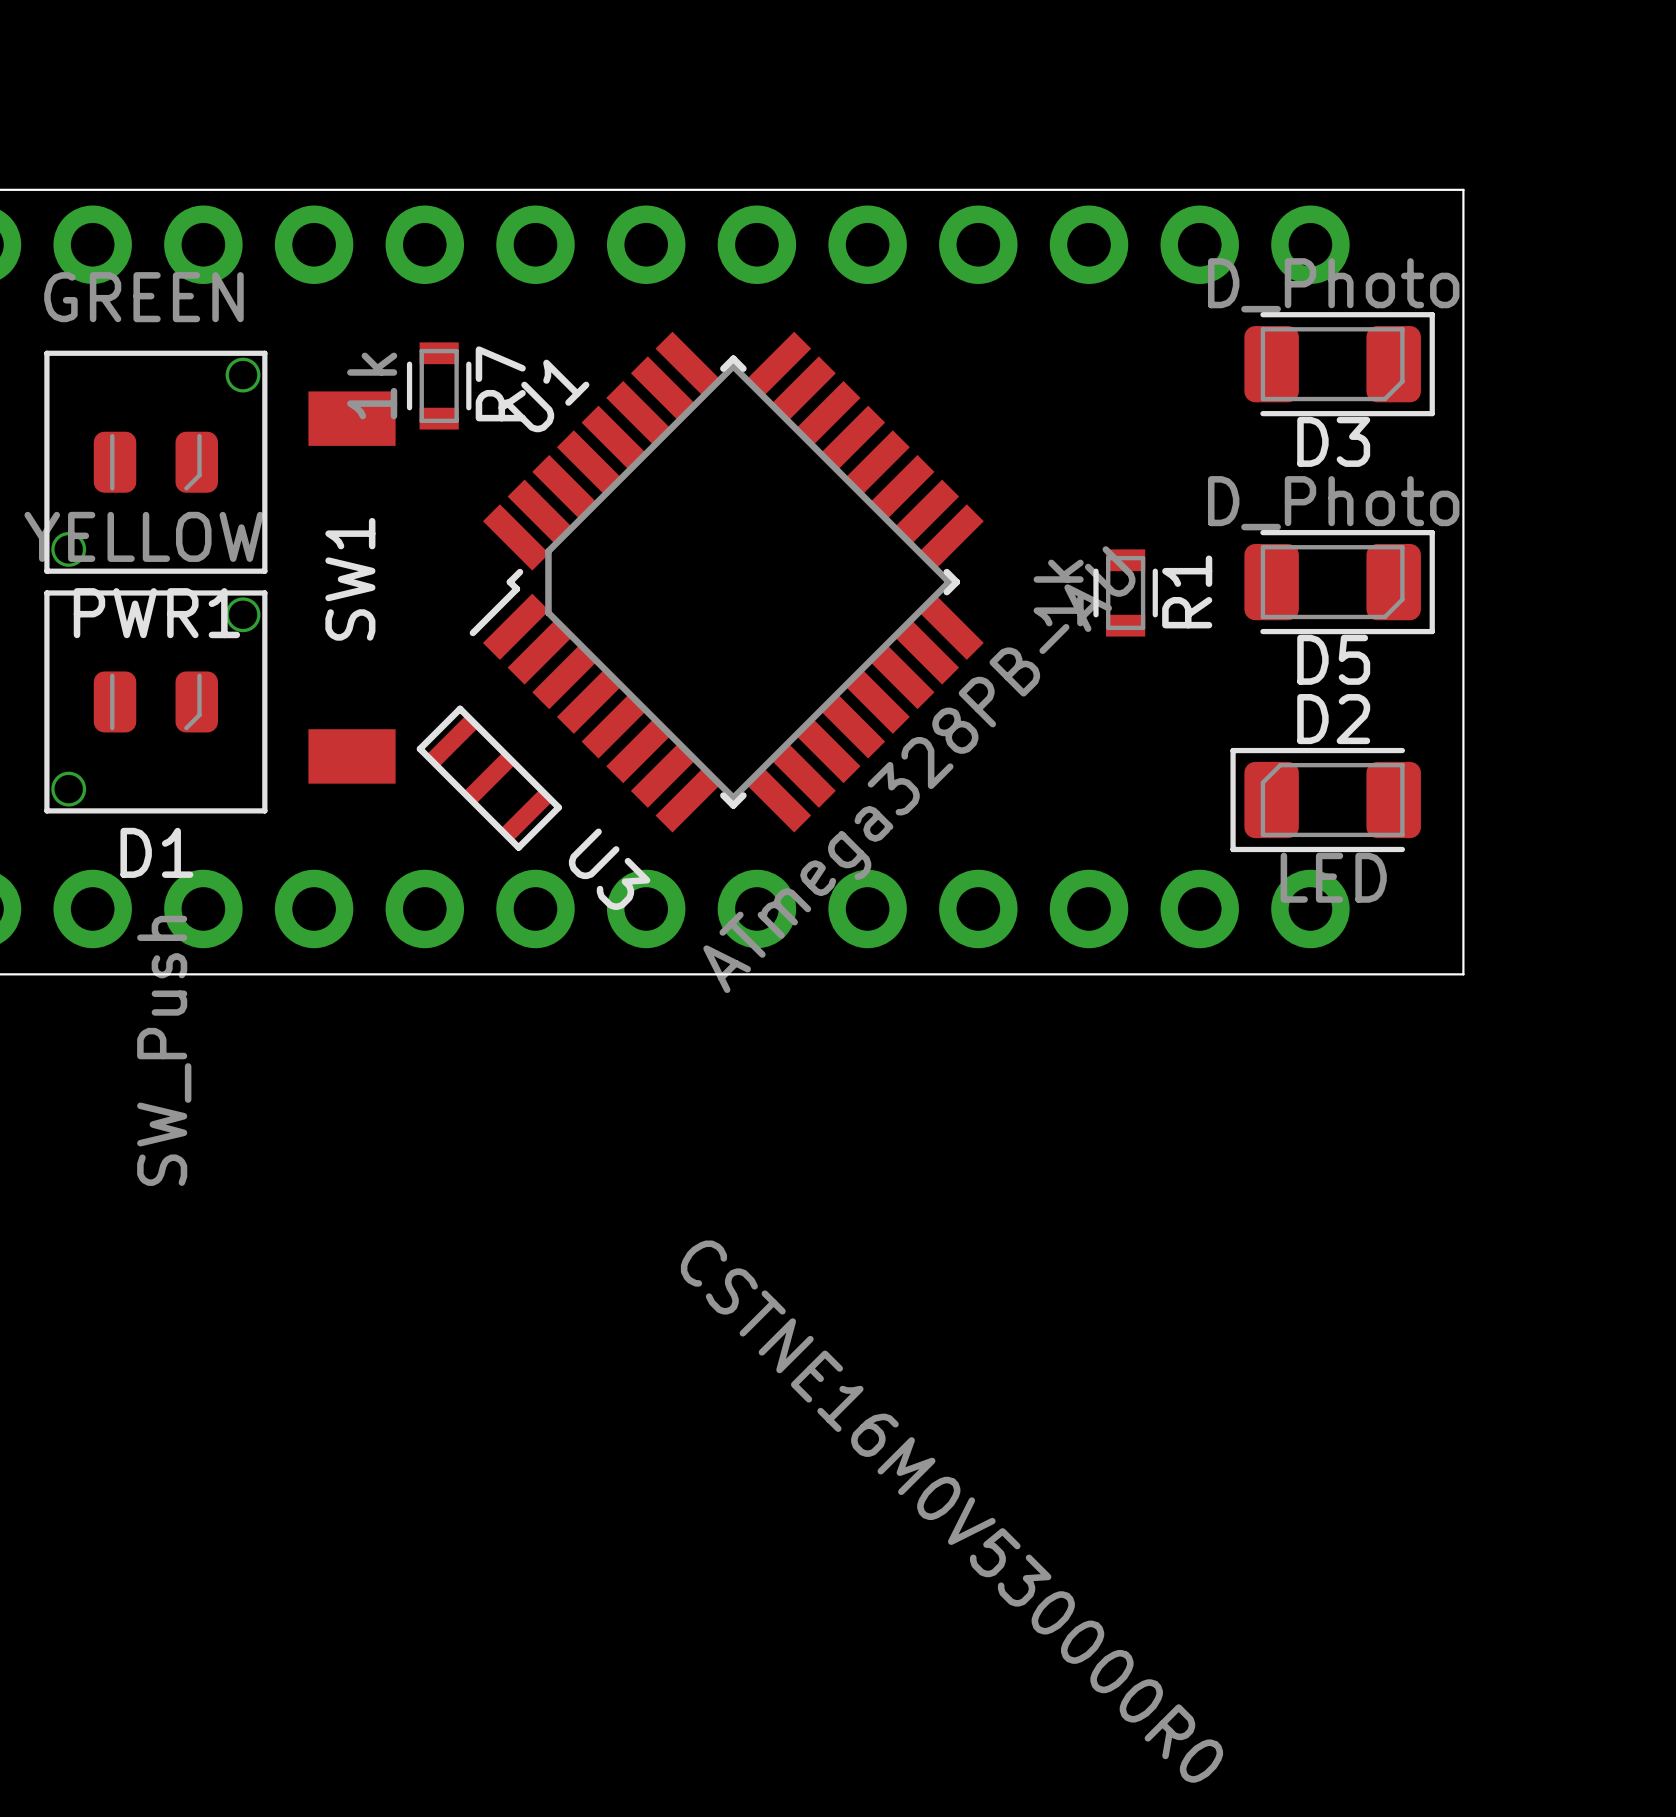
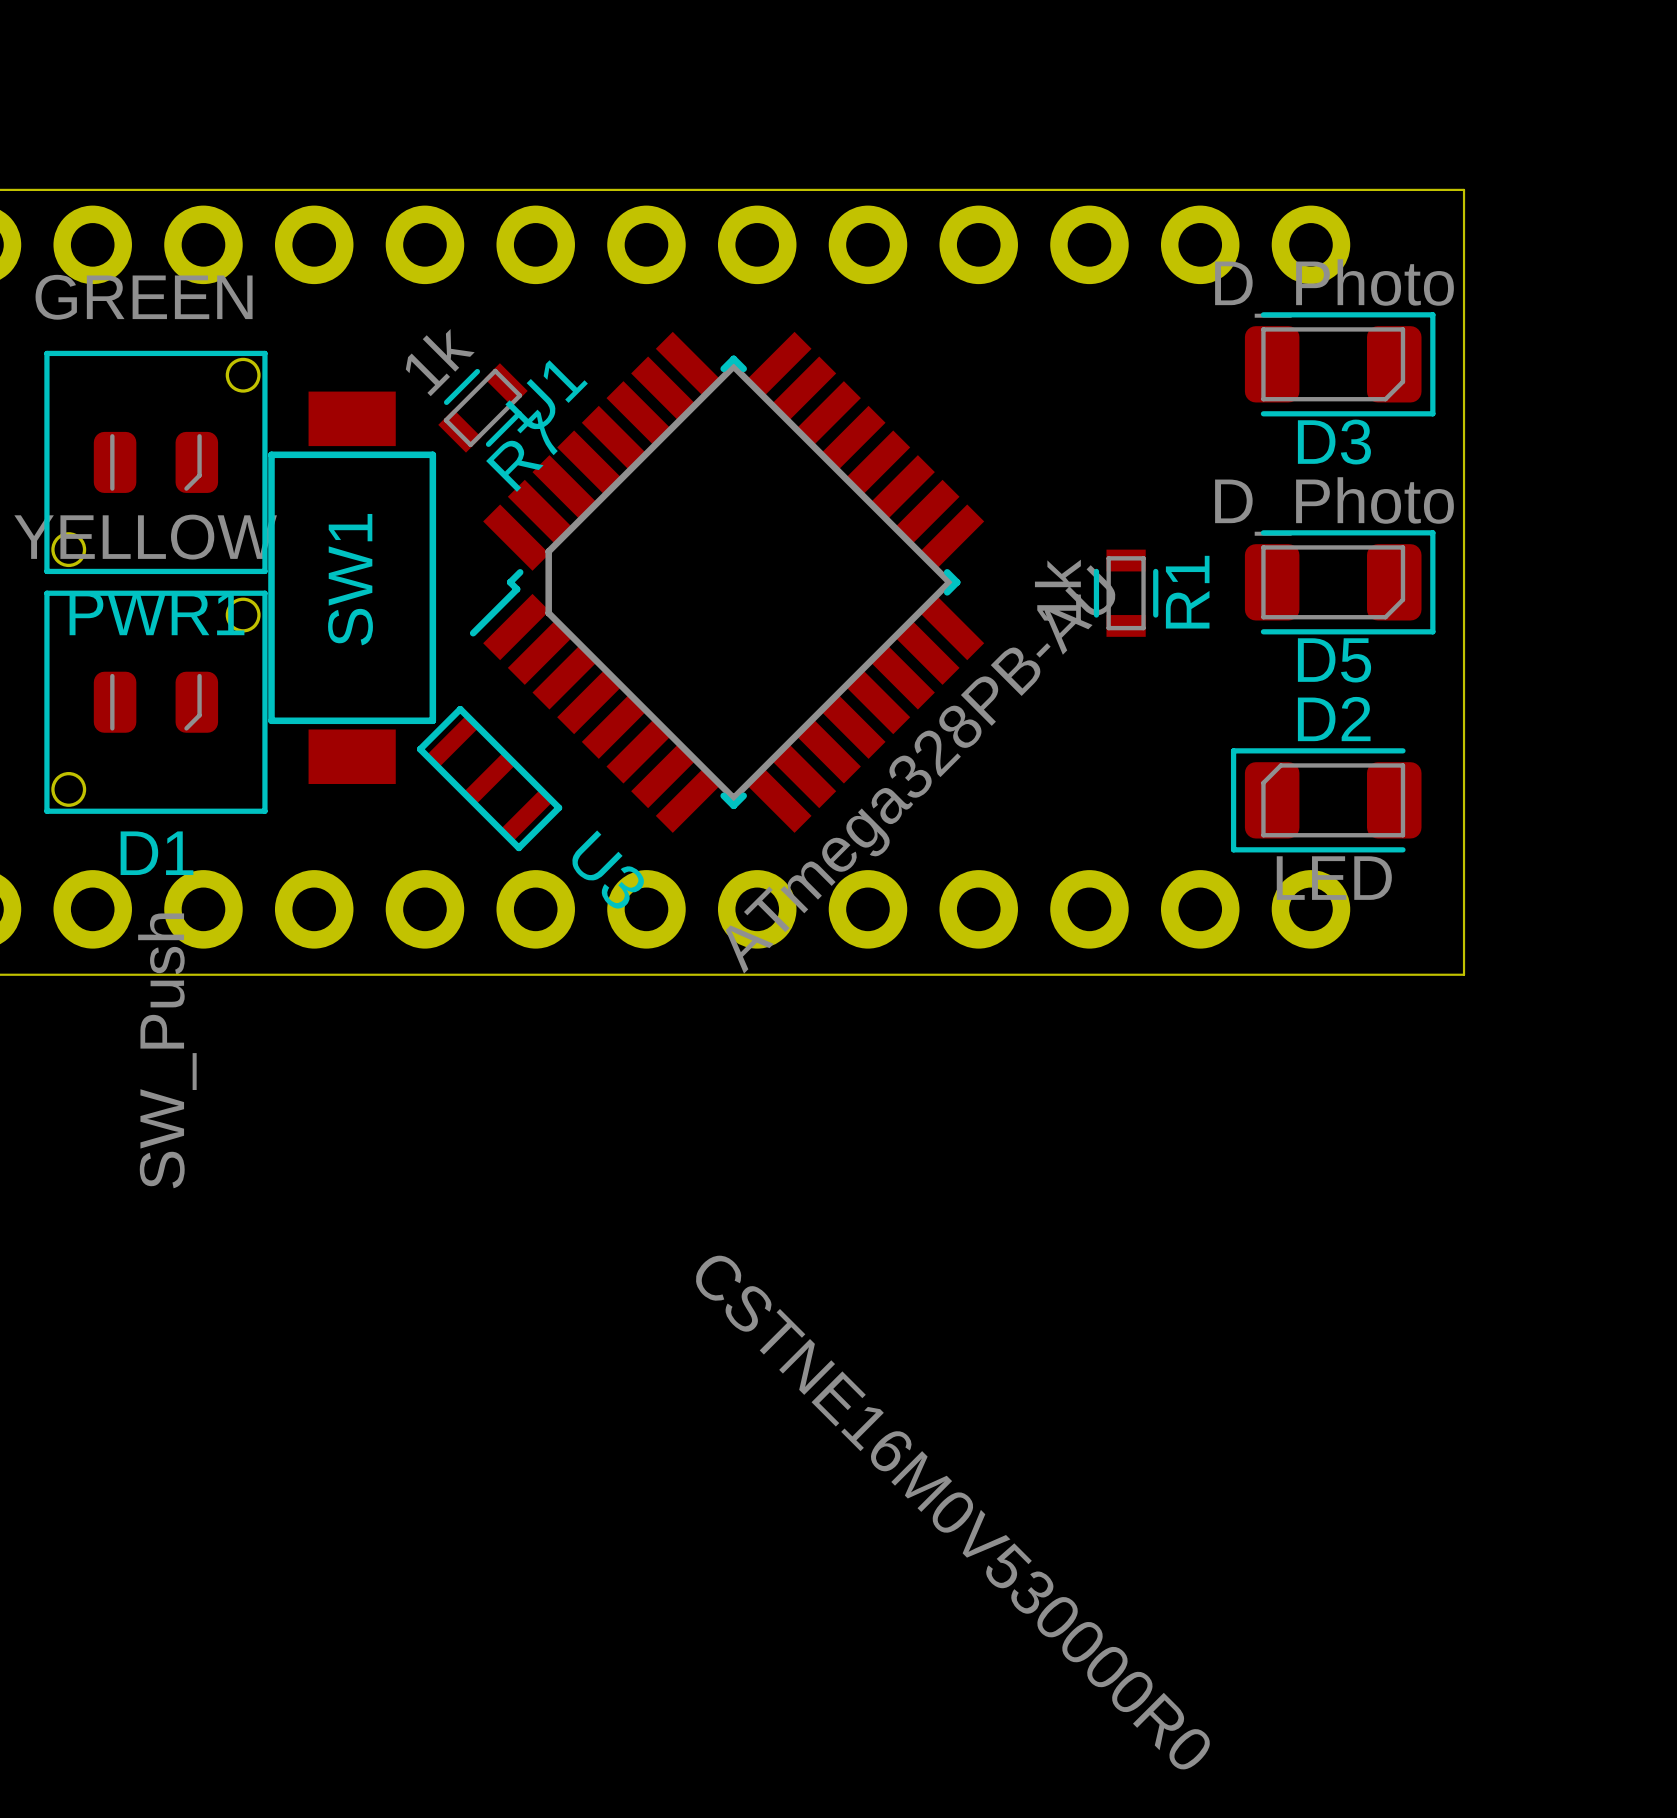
R7 rotation: 0° (439, 385) -> 45° clockwise (482, 407)
SW1 footprint: [308, 391, 396, 784] -> [268, 391, 437, 784]

